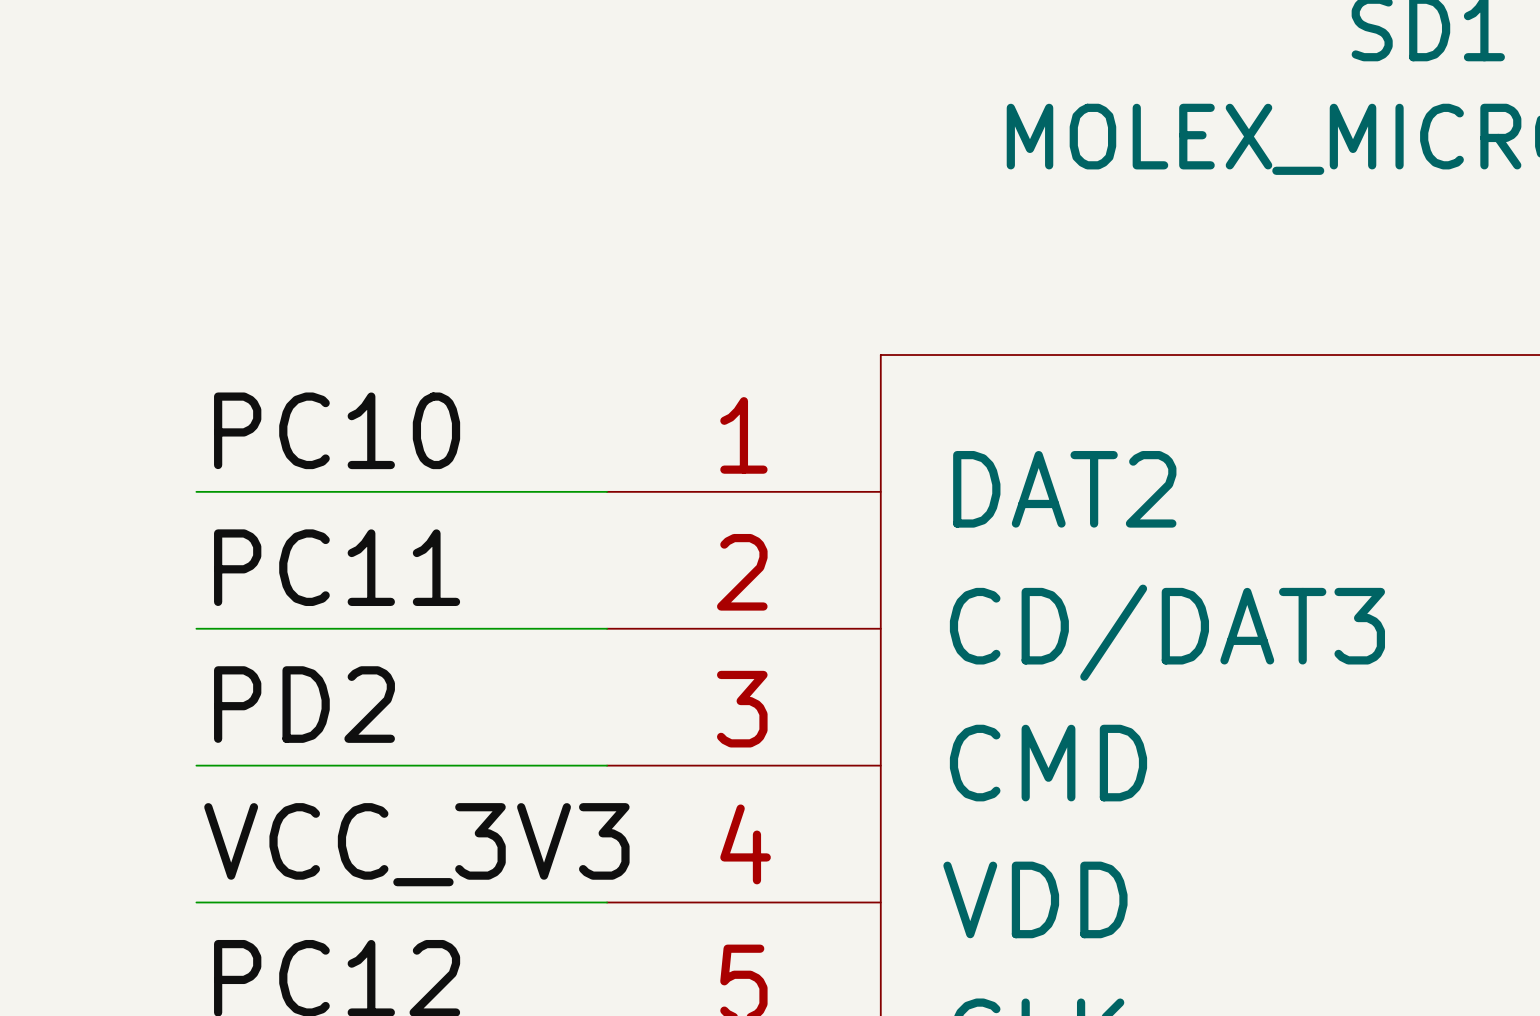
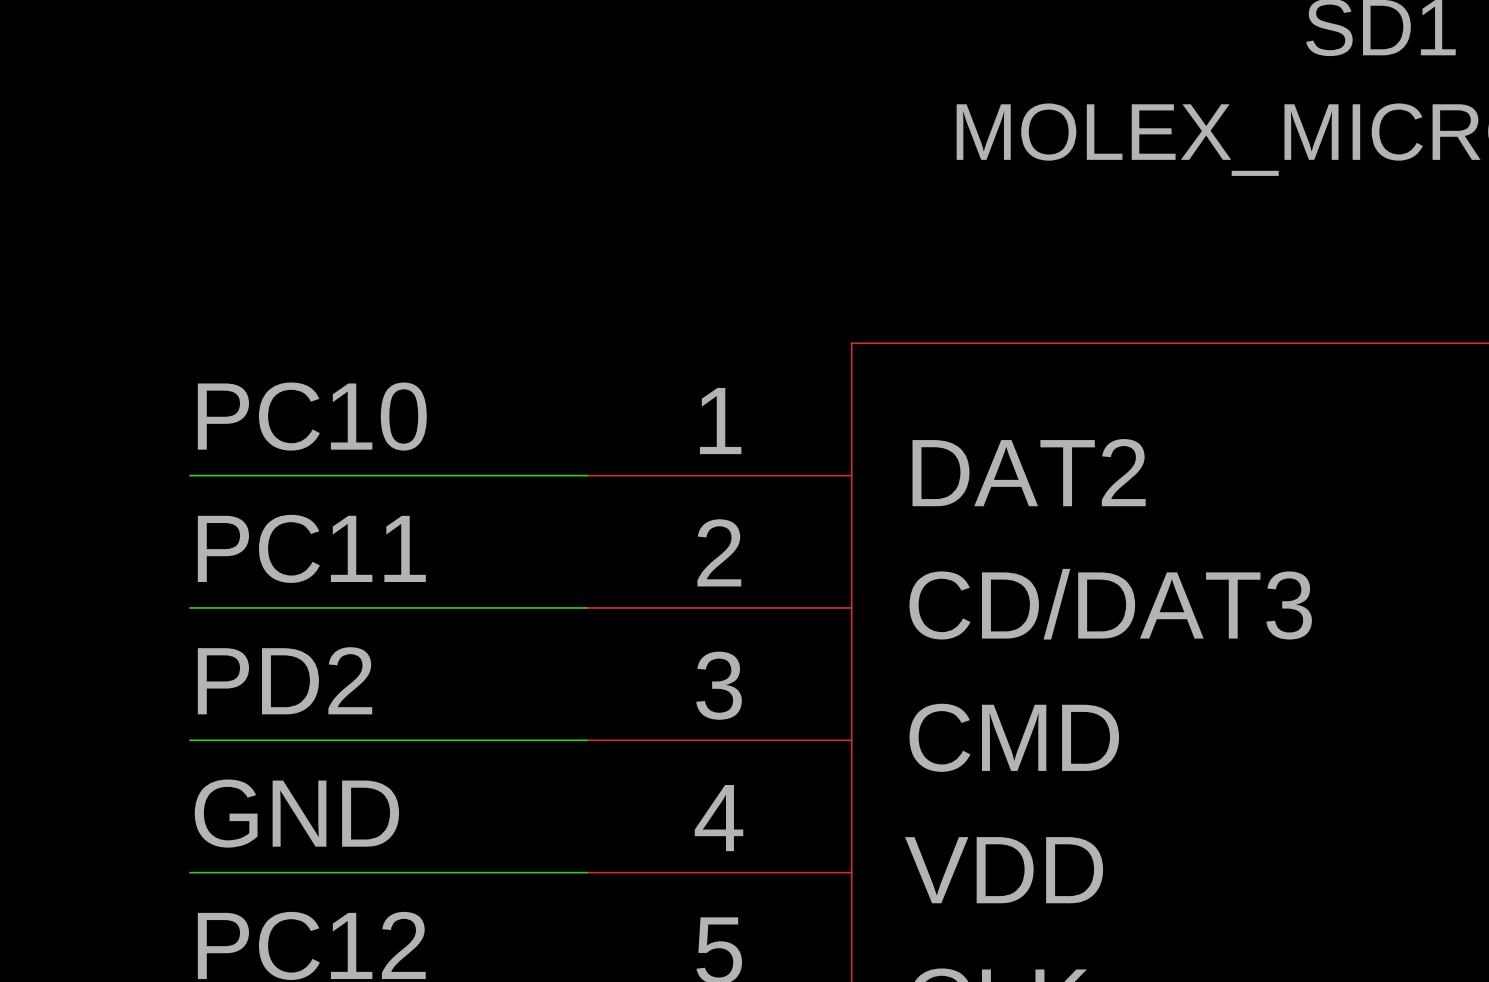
label: VCC_3V3 (416, 844) -> GND (296, 813)

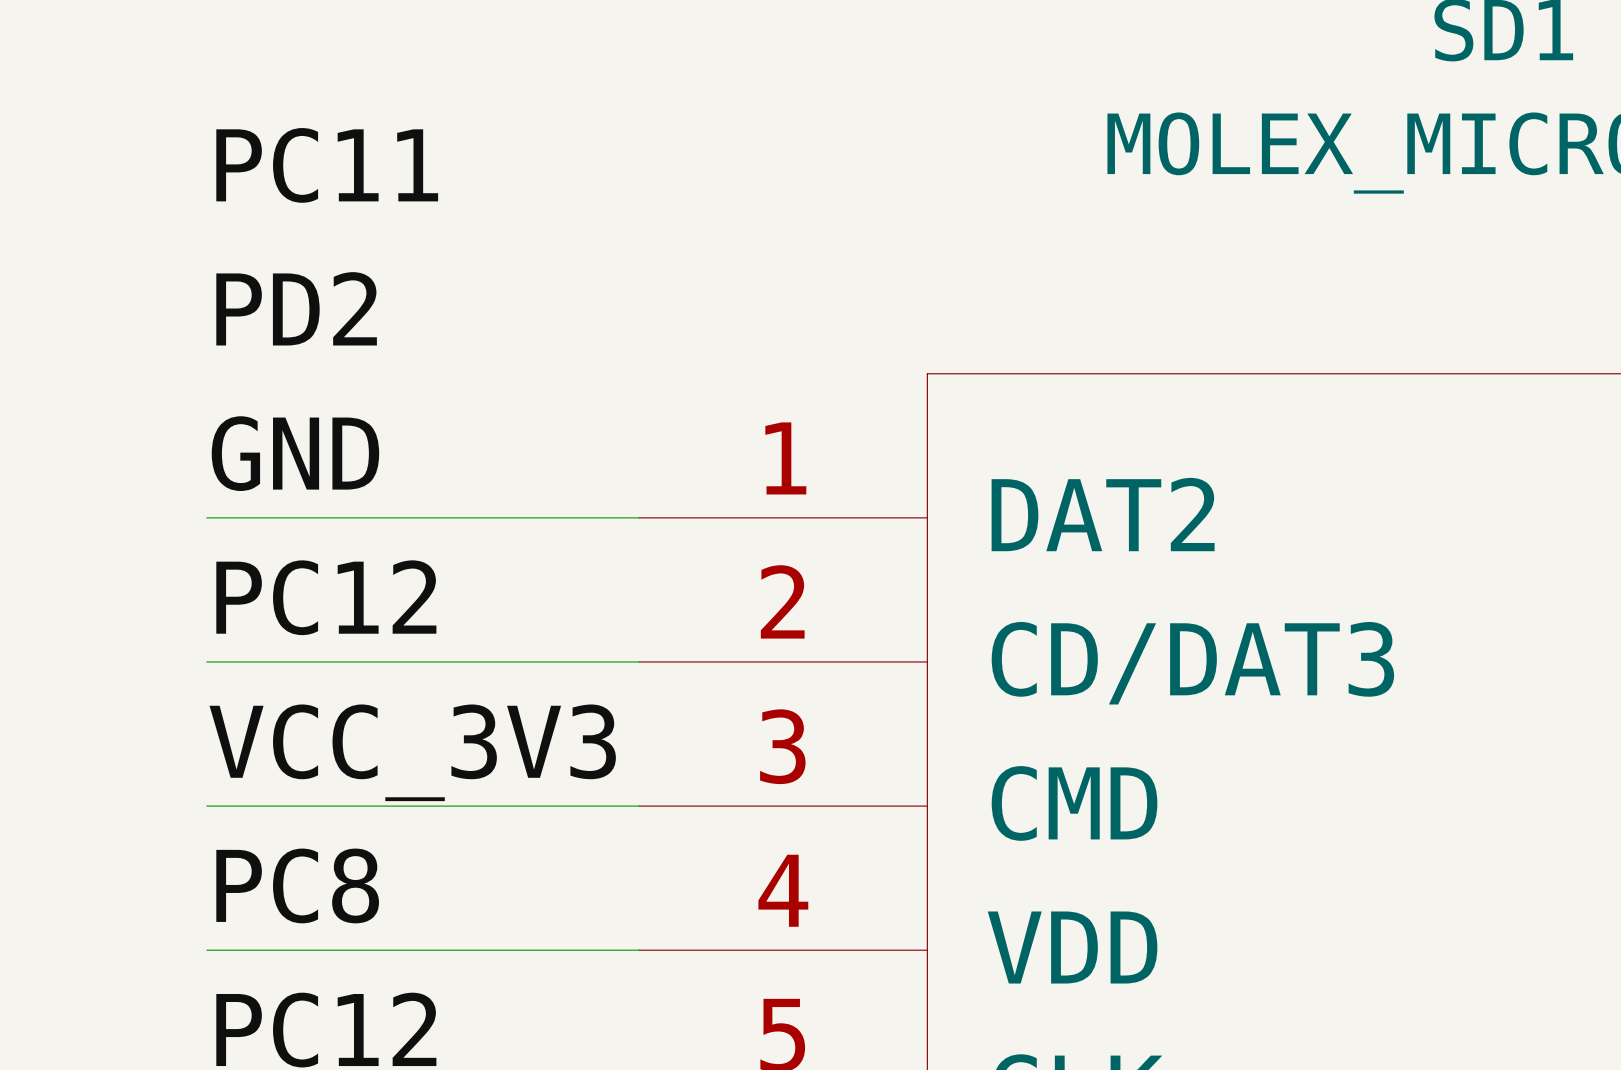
label: none -> PC11 (327, 165)
label: none -> PD2 (296, 308)
label: PC10 (312, 416) -> GND (295, 453)
label: PC11 (311, 548) -> PC12 (326, 597)
label: PD2 (285, 680) -> VCC_3V3 (412, 752)
label: GND (296, 813) -> PC8 (297, 885)

